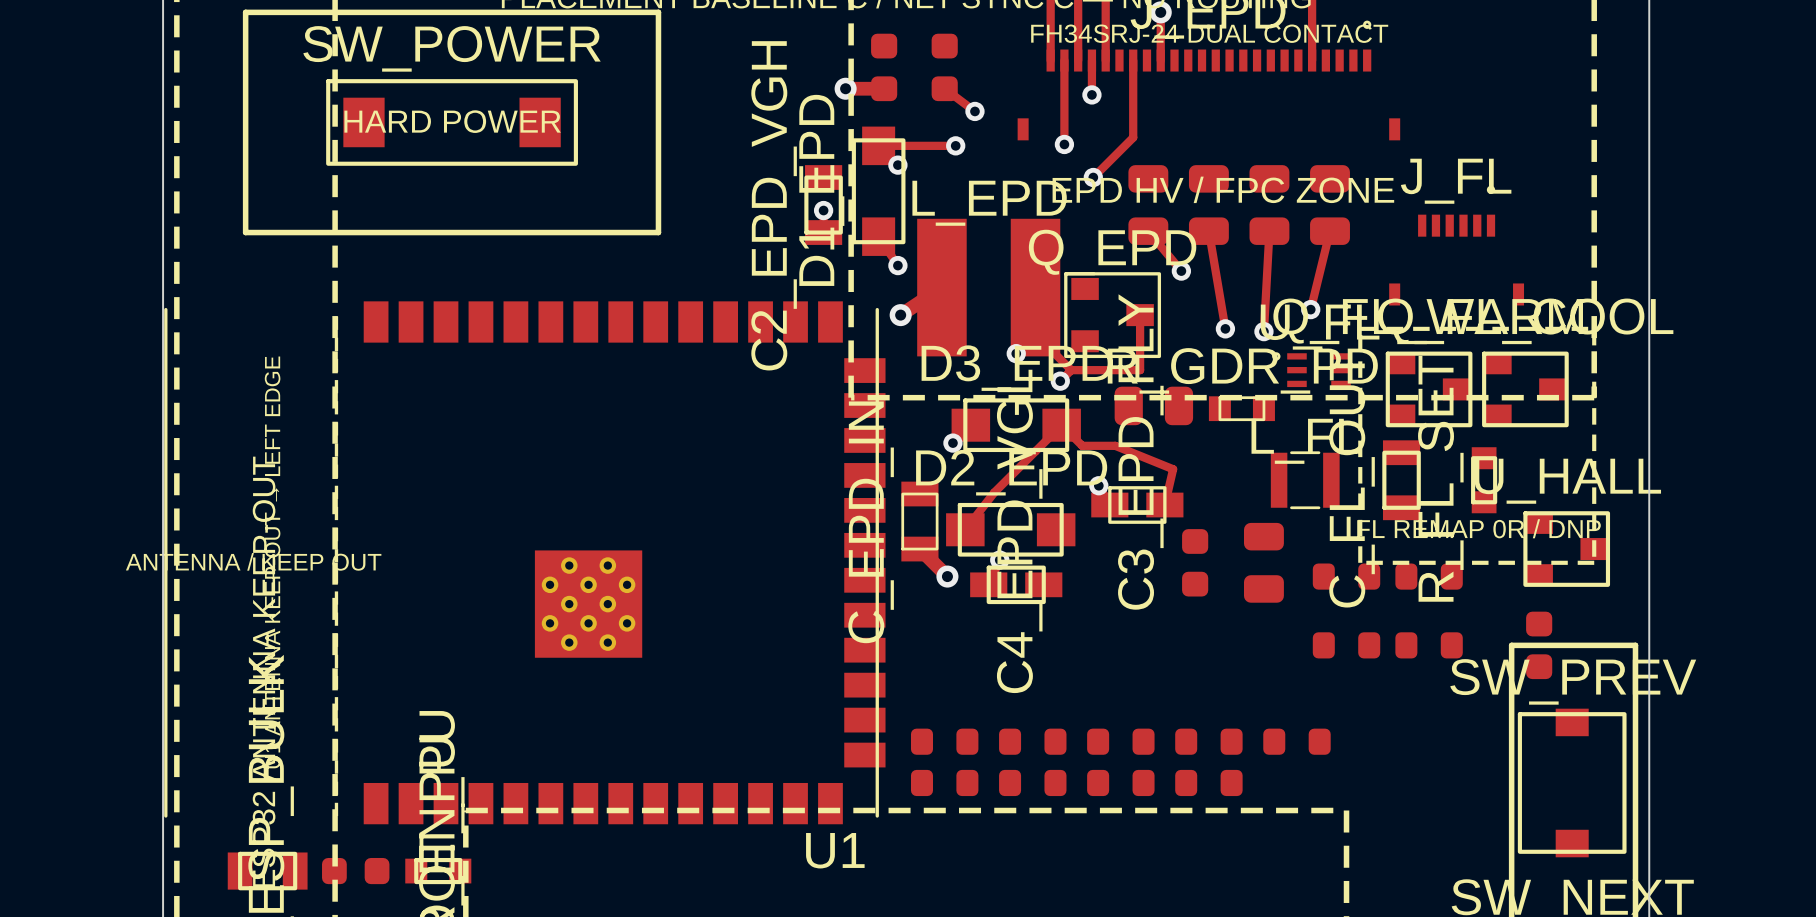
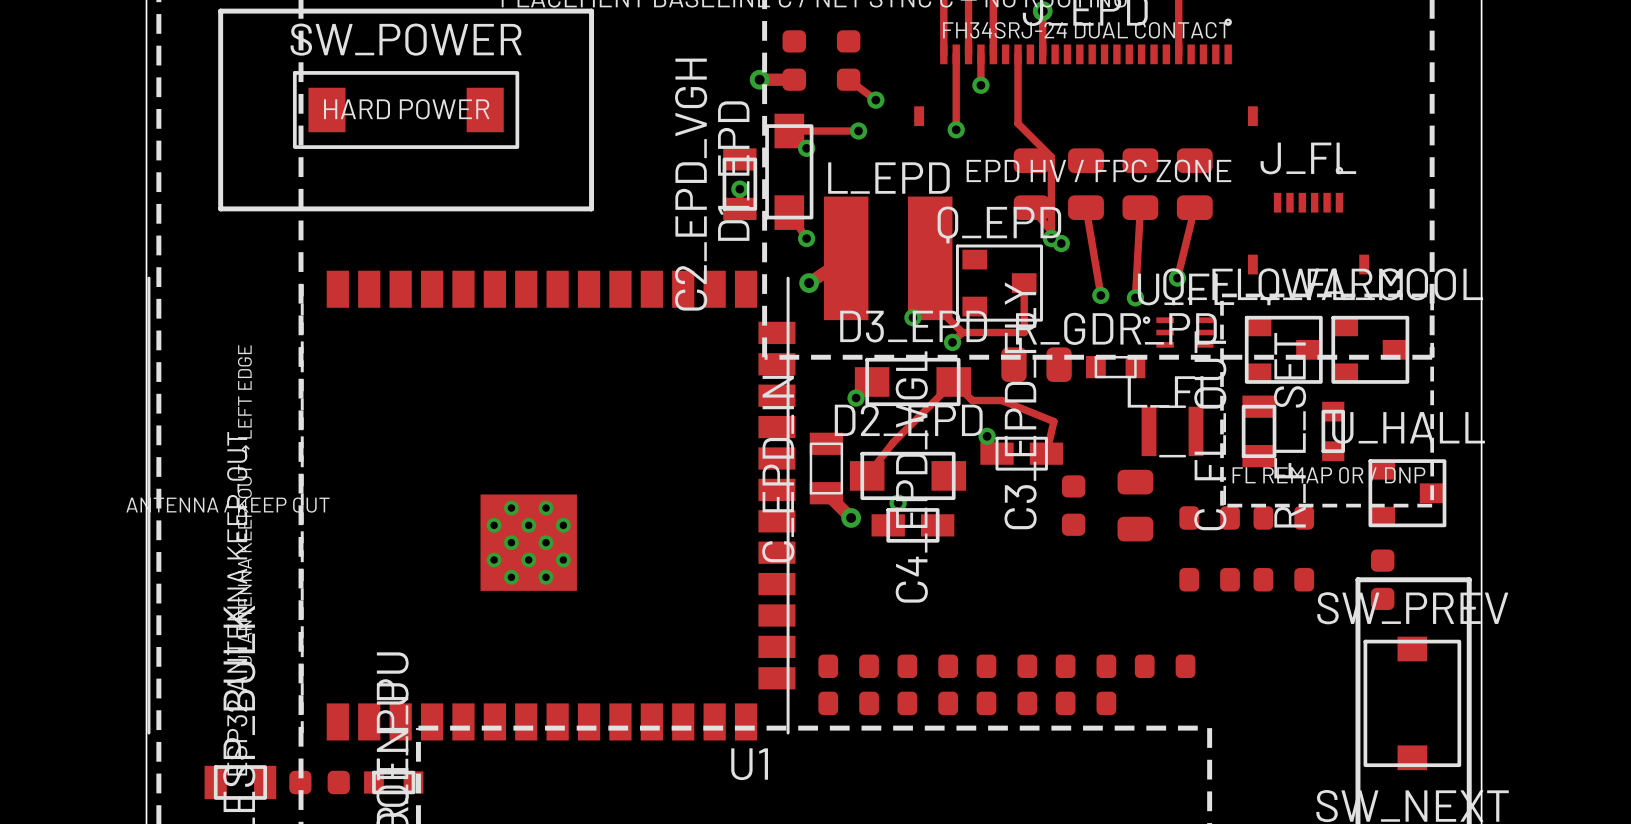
track: (1133, 137) (1093, 177) -> (1018, 123) (1051, 156) (1051, 238)
via position: (1093, 177) -> (1051, 238)

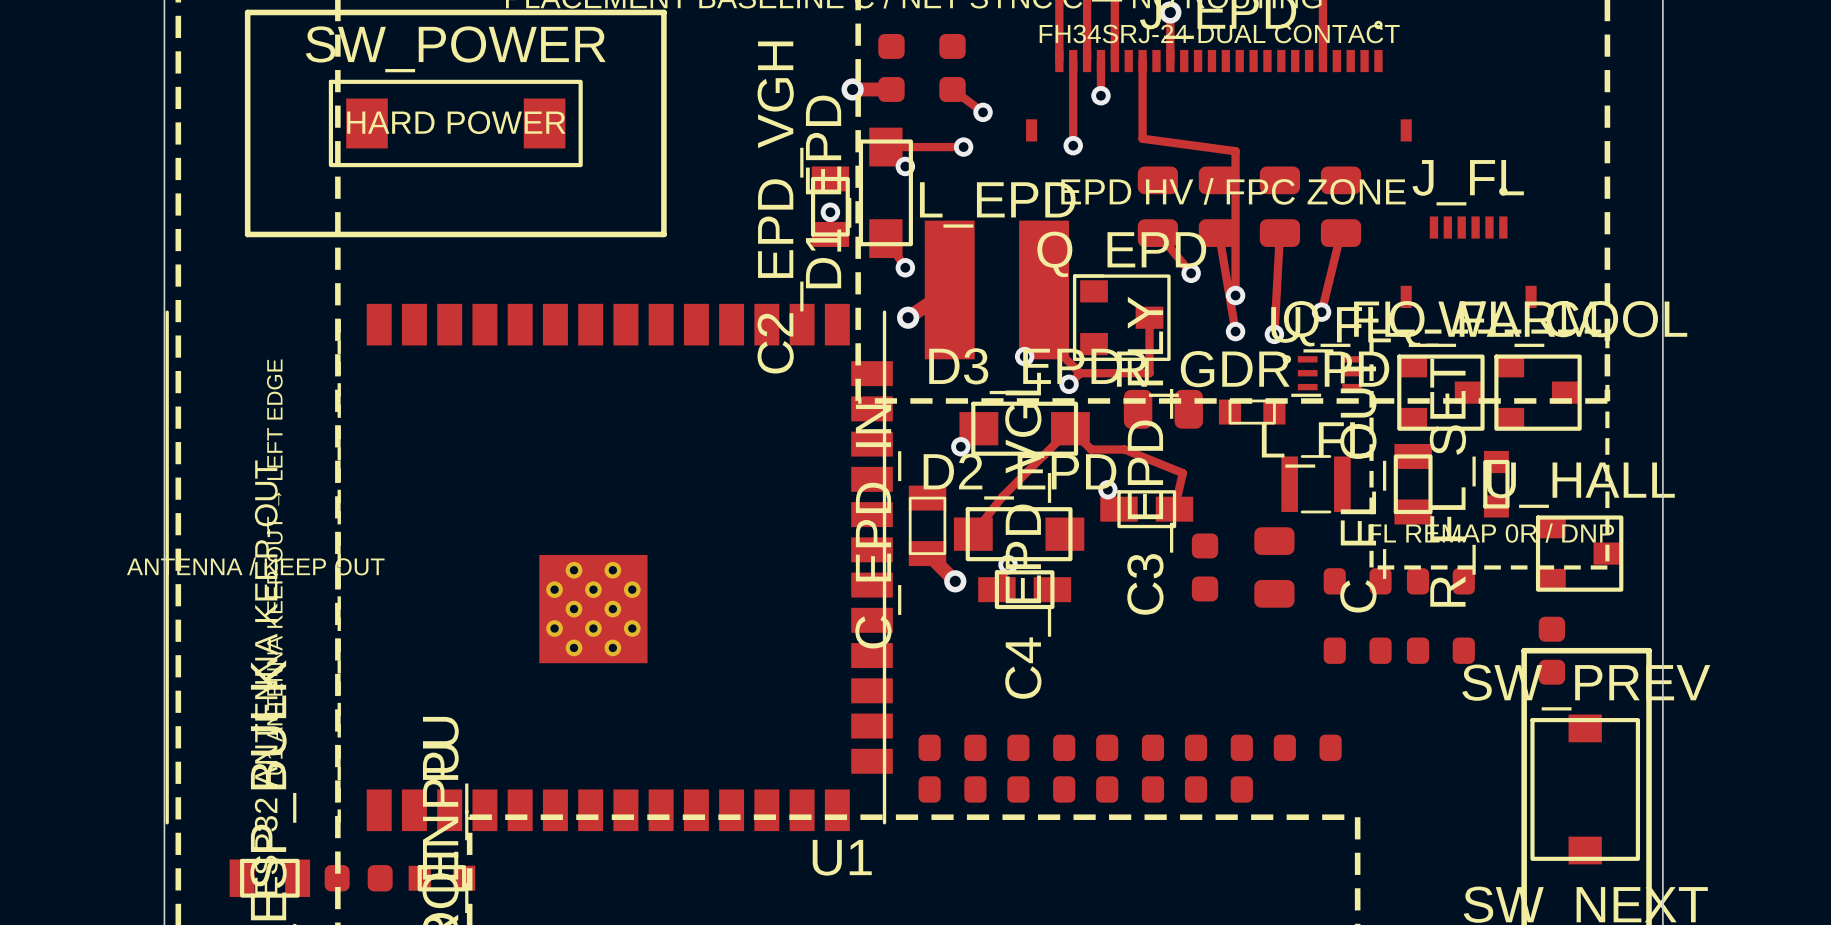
track: (1018, 123) (1051, 156) (1051, 238) -> (1142, 138) (1235, 151) (1235, 295)
via position: (1051, 238) -> (1235, 295)

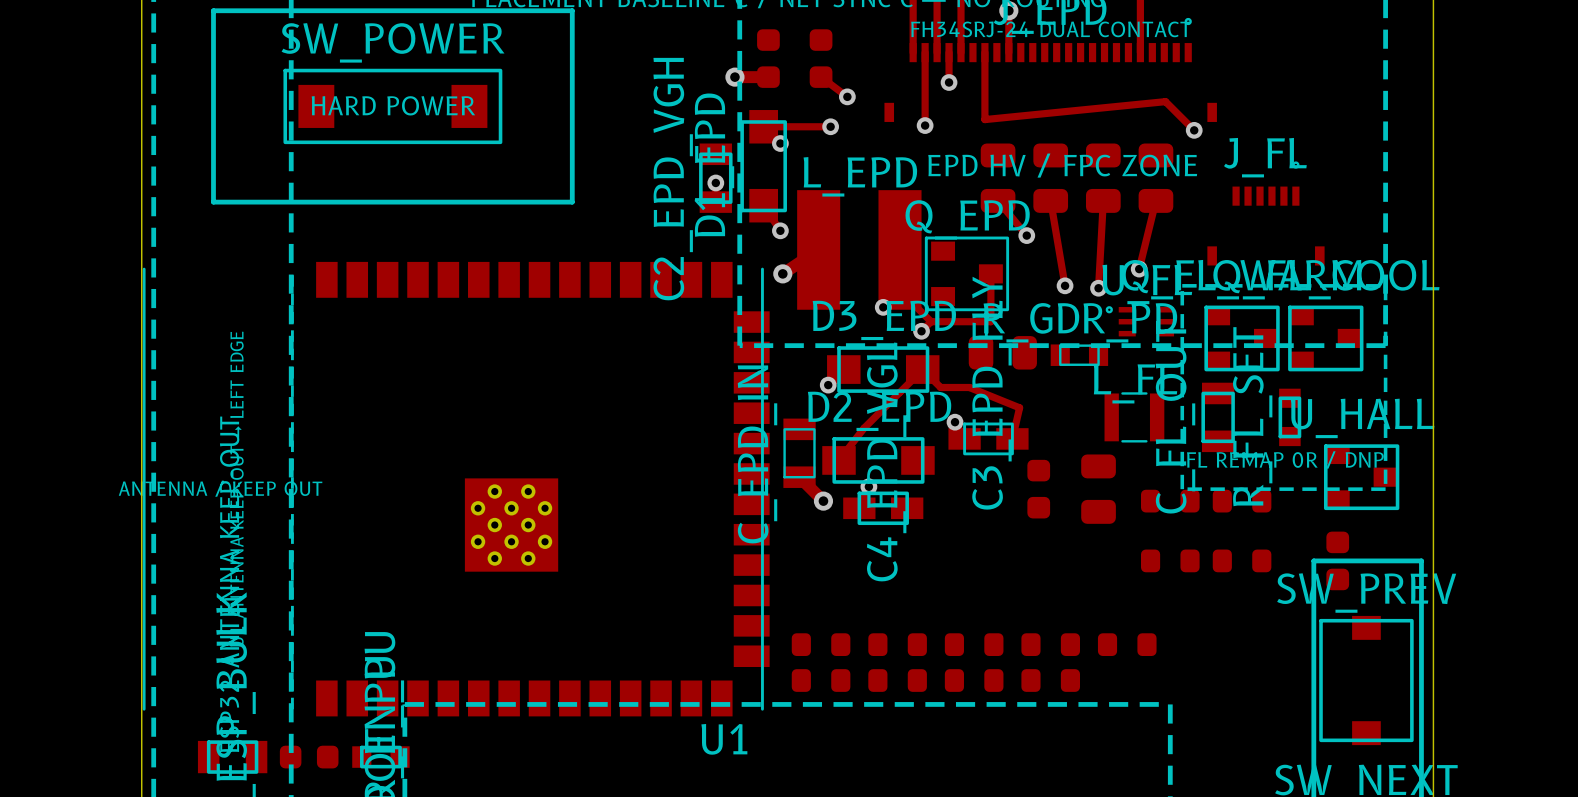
track: (1142, 138) (1235, 151) (1235, 295) -> (984, 119) (1165, 101) (1194, 130)
via: none -> (1194, 130)
via: (1235, 295) -> none

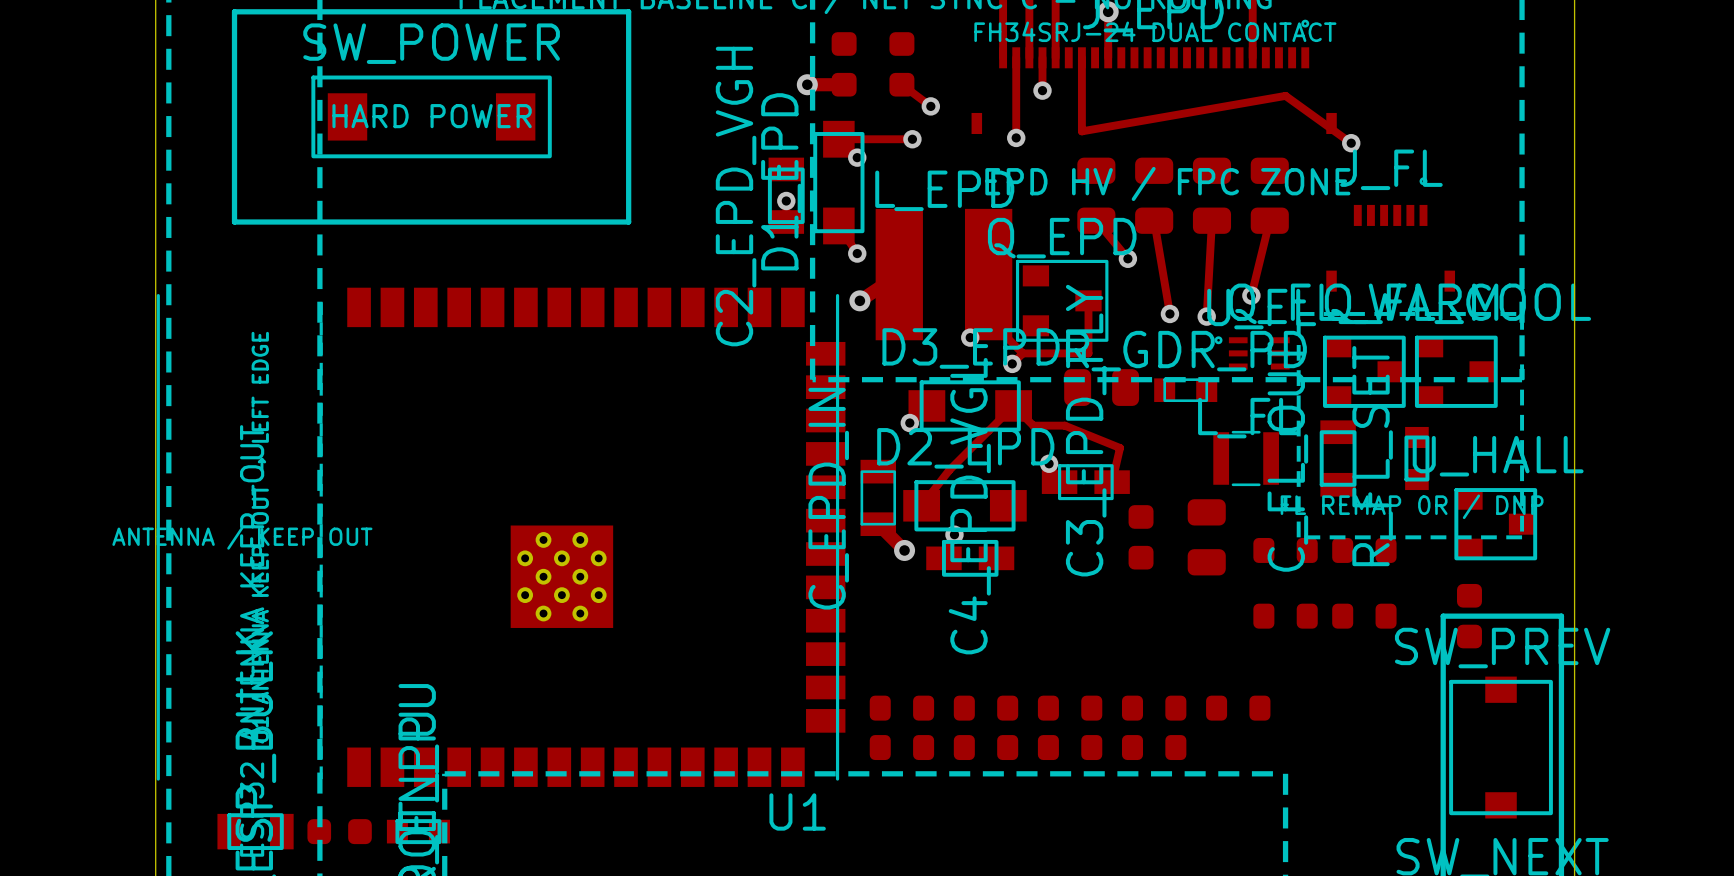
track: (984, 119) (1165, 101) (1194, 130) -> (1081, 131) (1285, 95) (1351, 143)
via position: (1194, 130) -> (1351, 143)

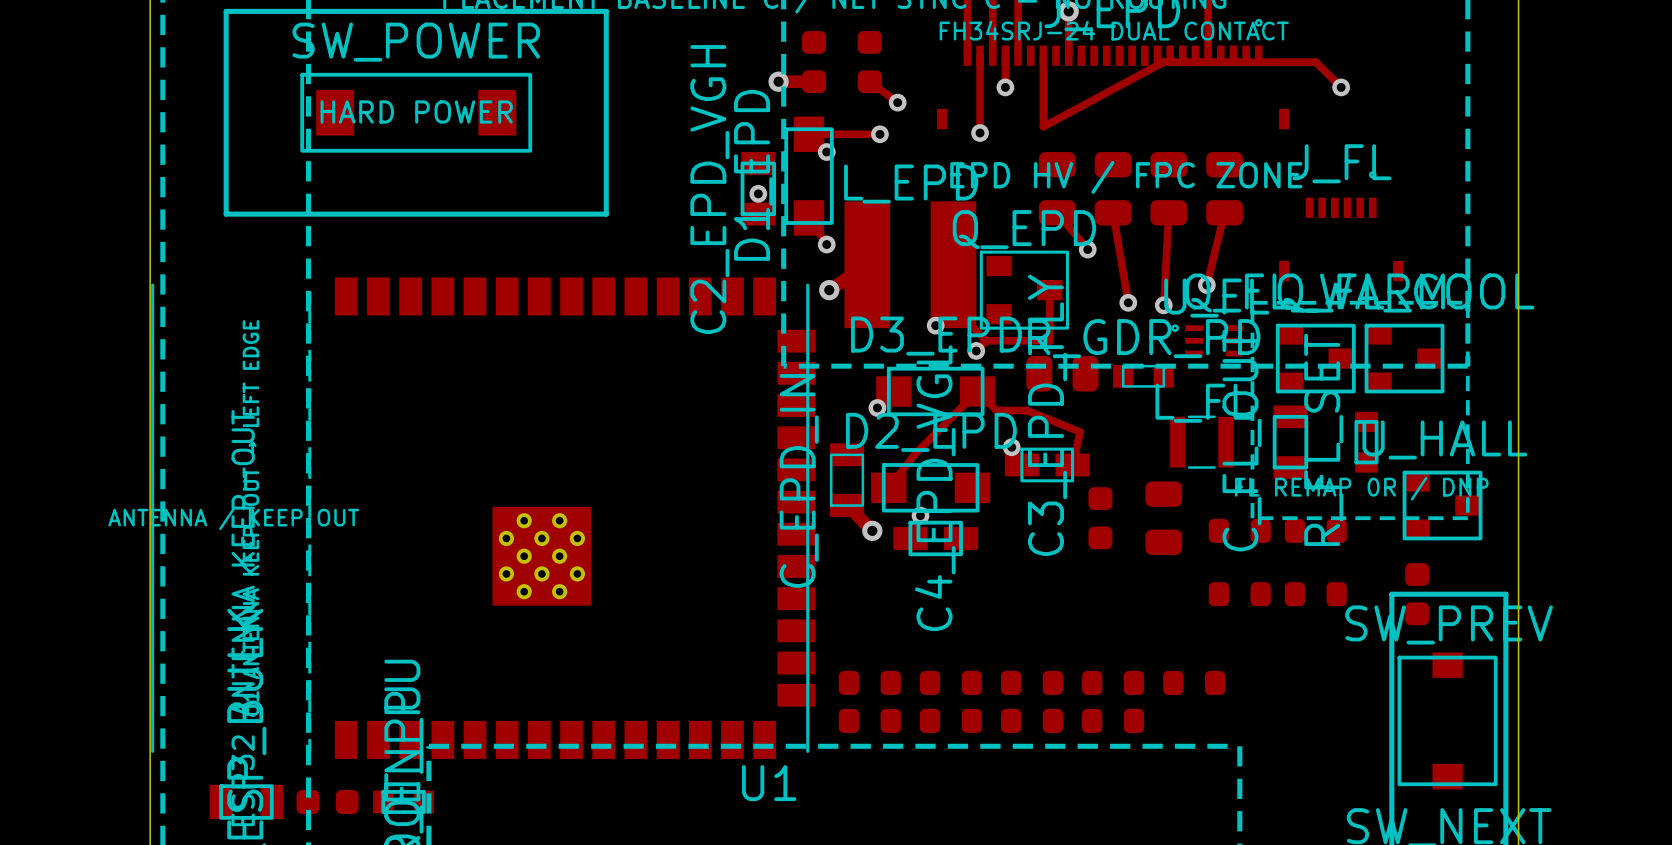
track: (1081, 131) (1285, 95) (1351, 143) -> (1043, 126) (1163, 62) (1315, 62) (1341, 87)
via position: (1351, 143) -> (1341, 87)

